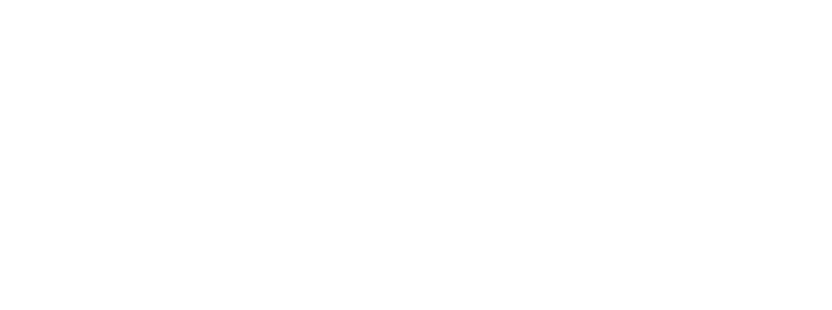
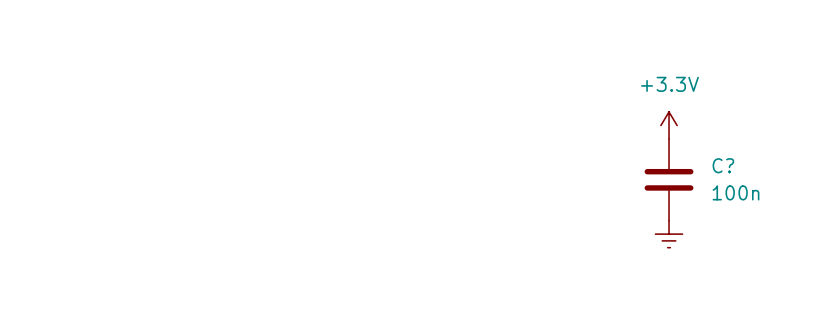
power symbol: none -> +3.3V (669, 125)
C?: none -> 100n (669, 179)
power symbol: none -> (669, 234)

